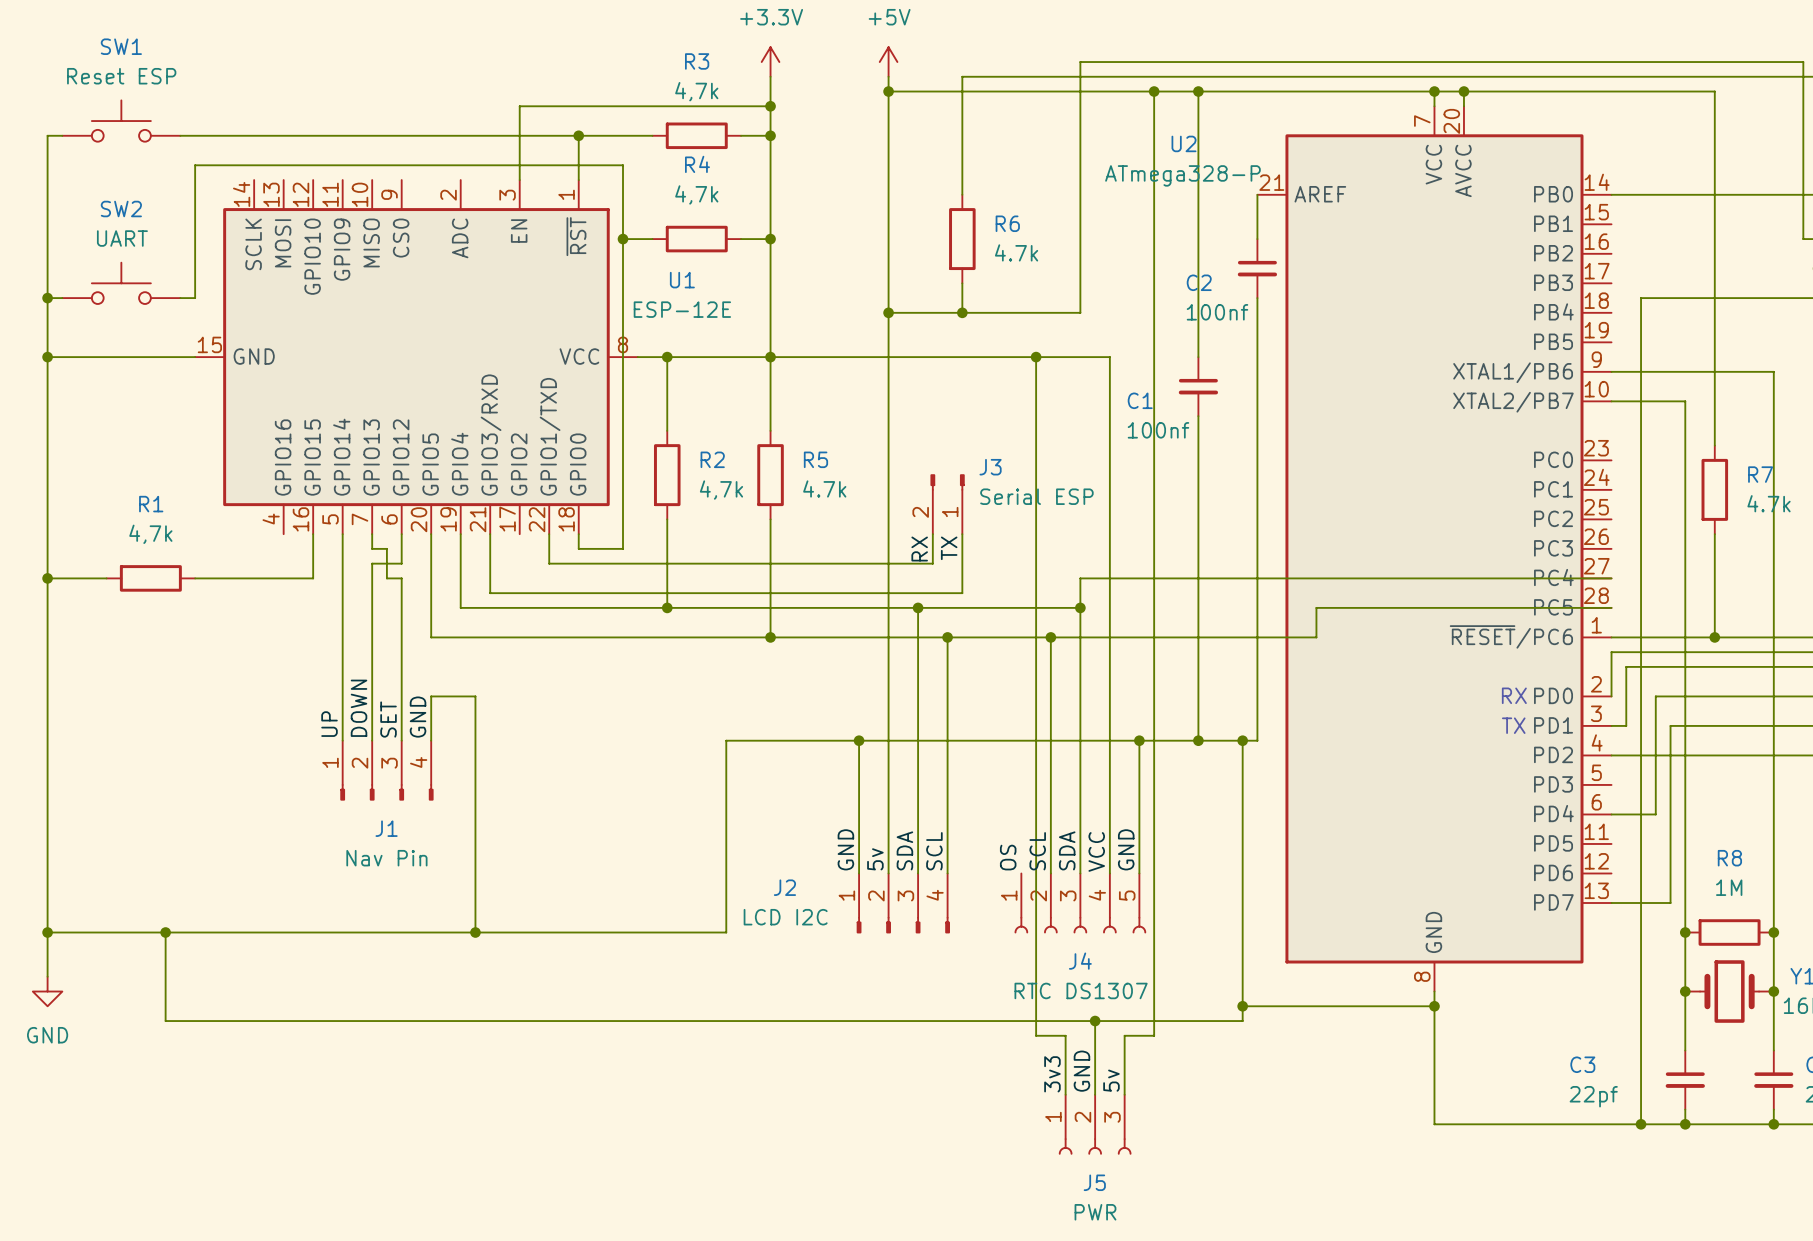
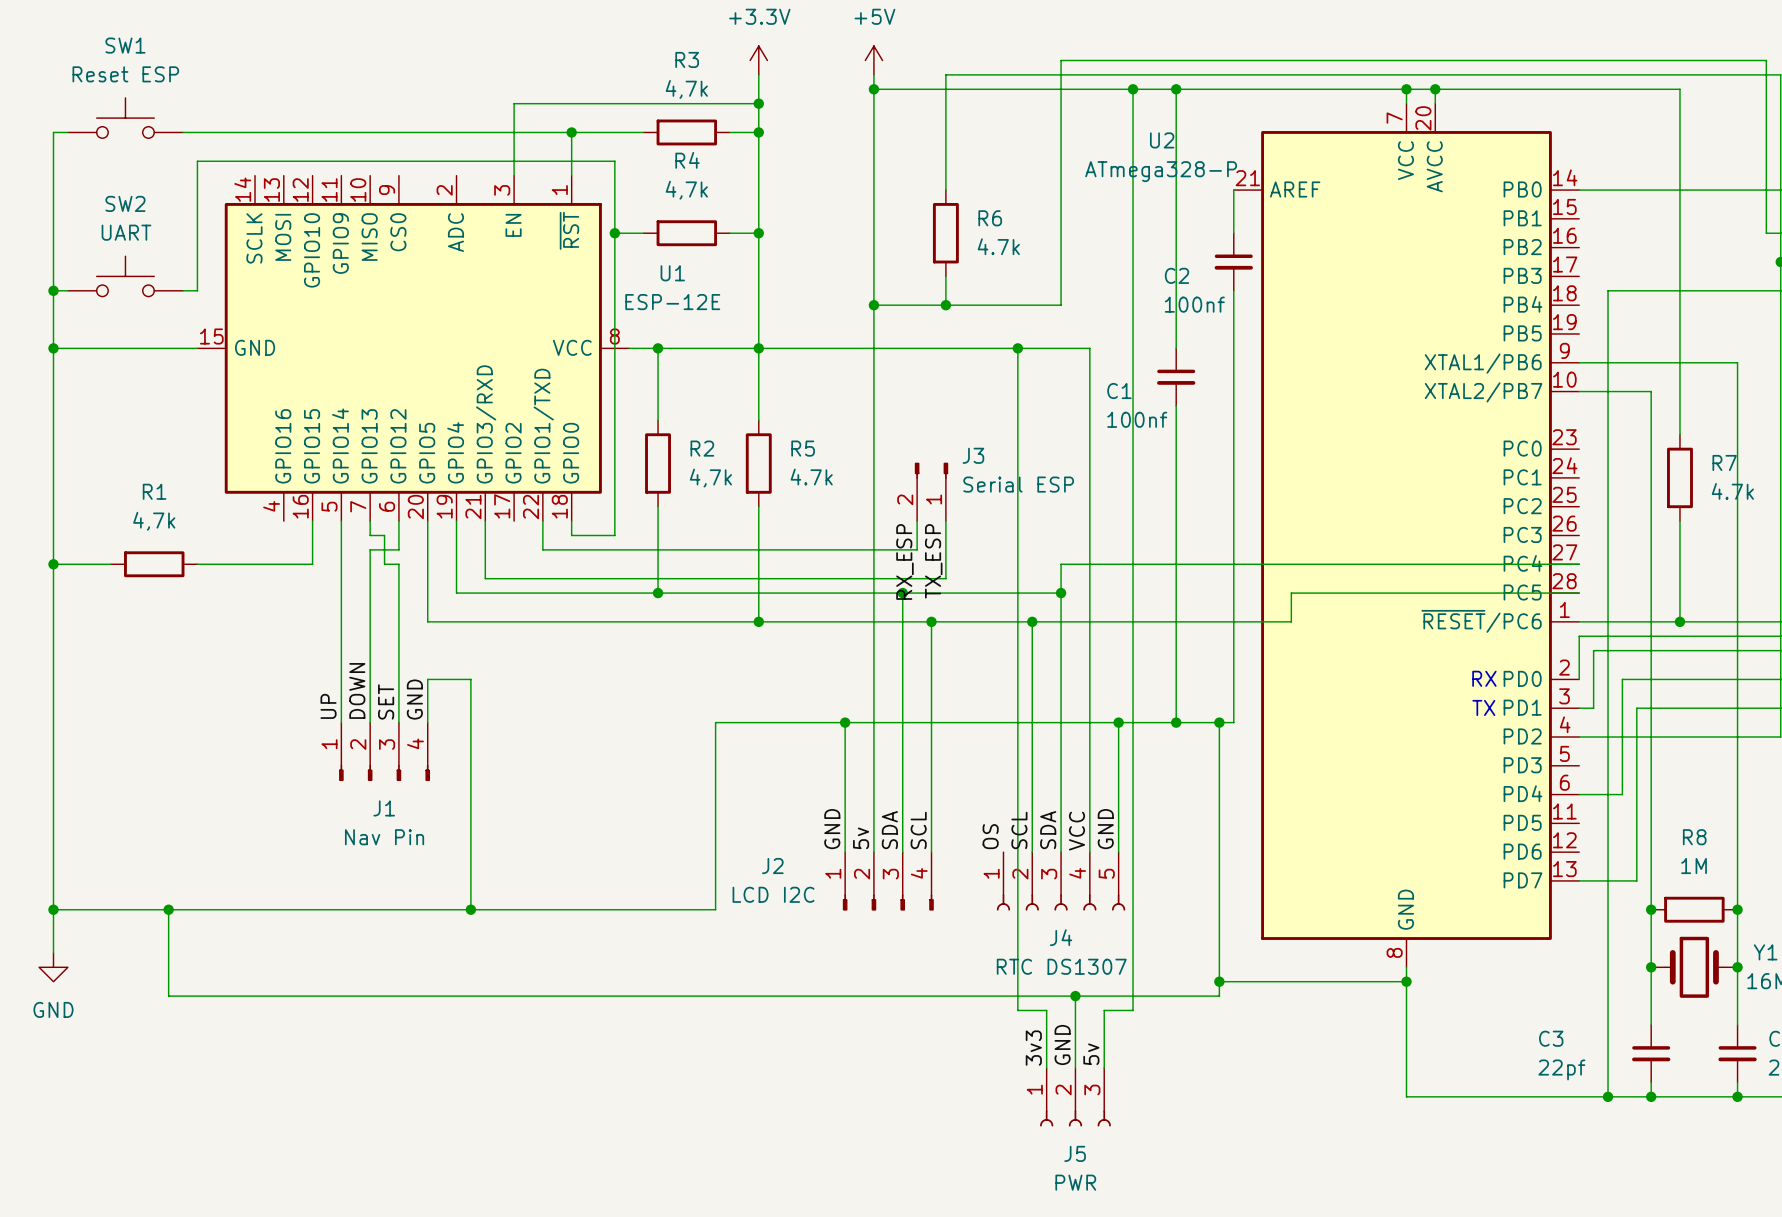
label: TX (949, 548) -> TX_ESP (933, 561)
label: RX (919, 549) -> RX_ESP (904, 561)

